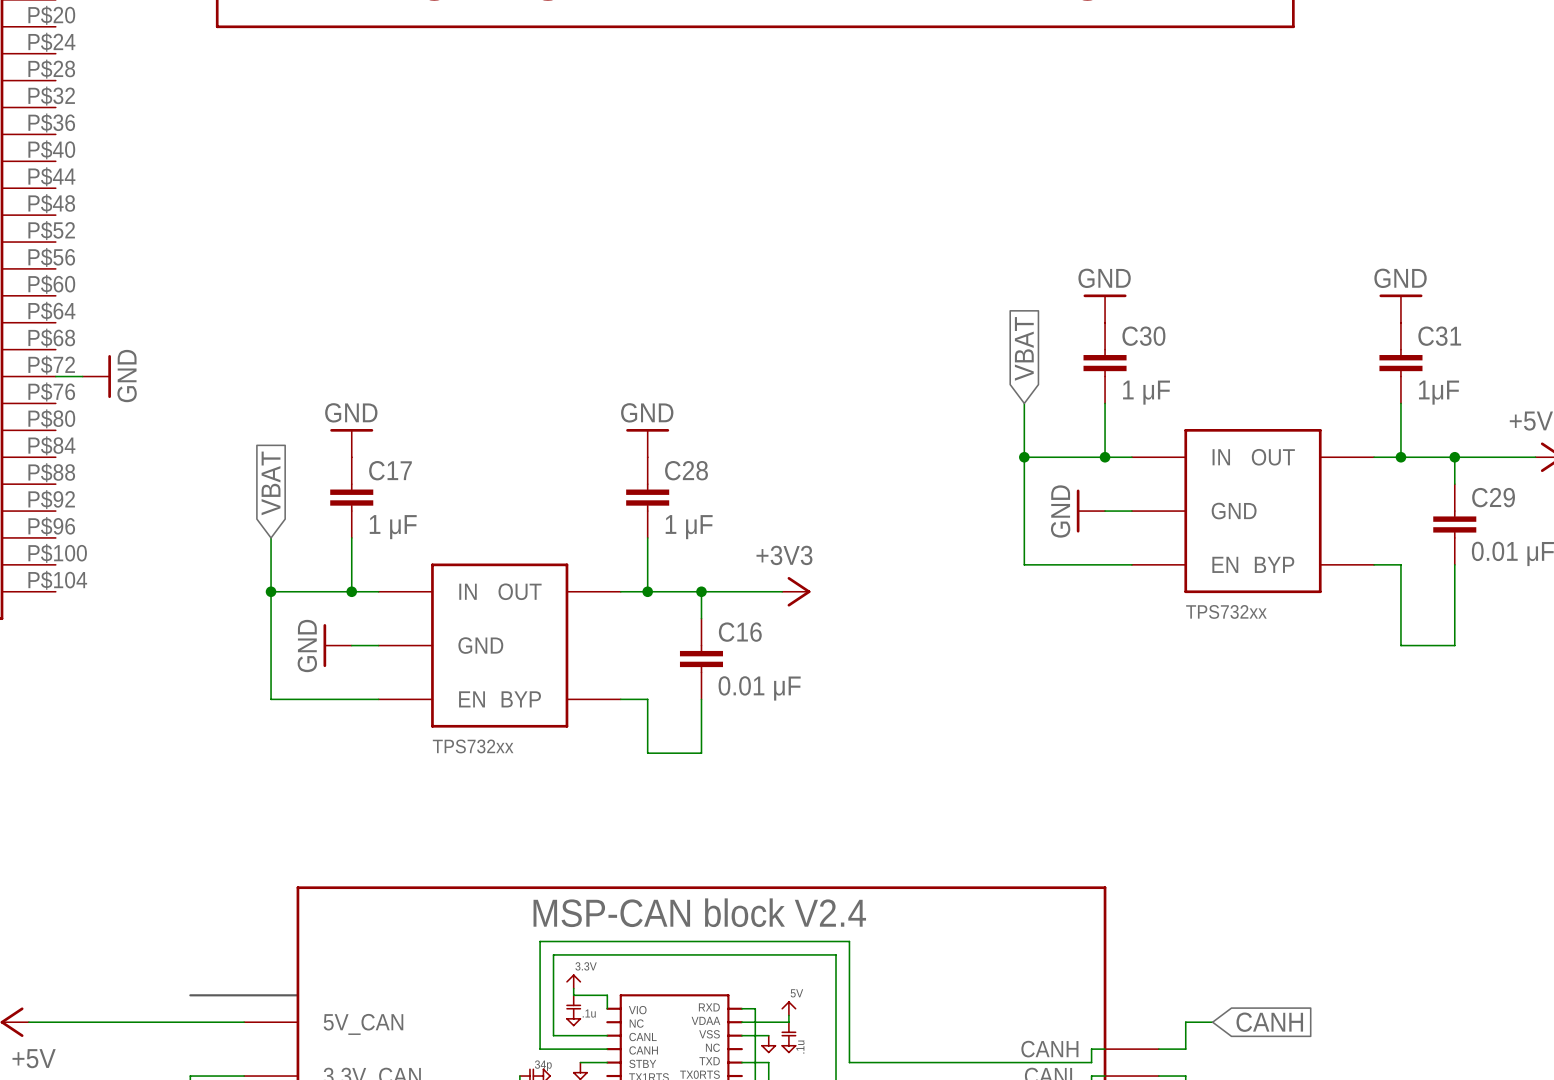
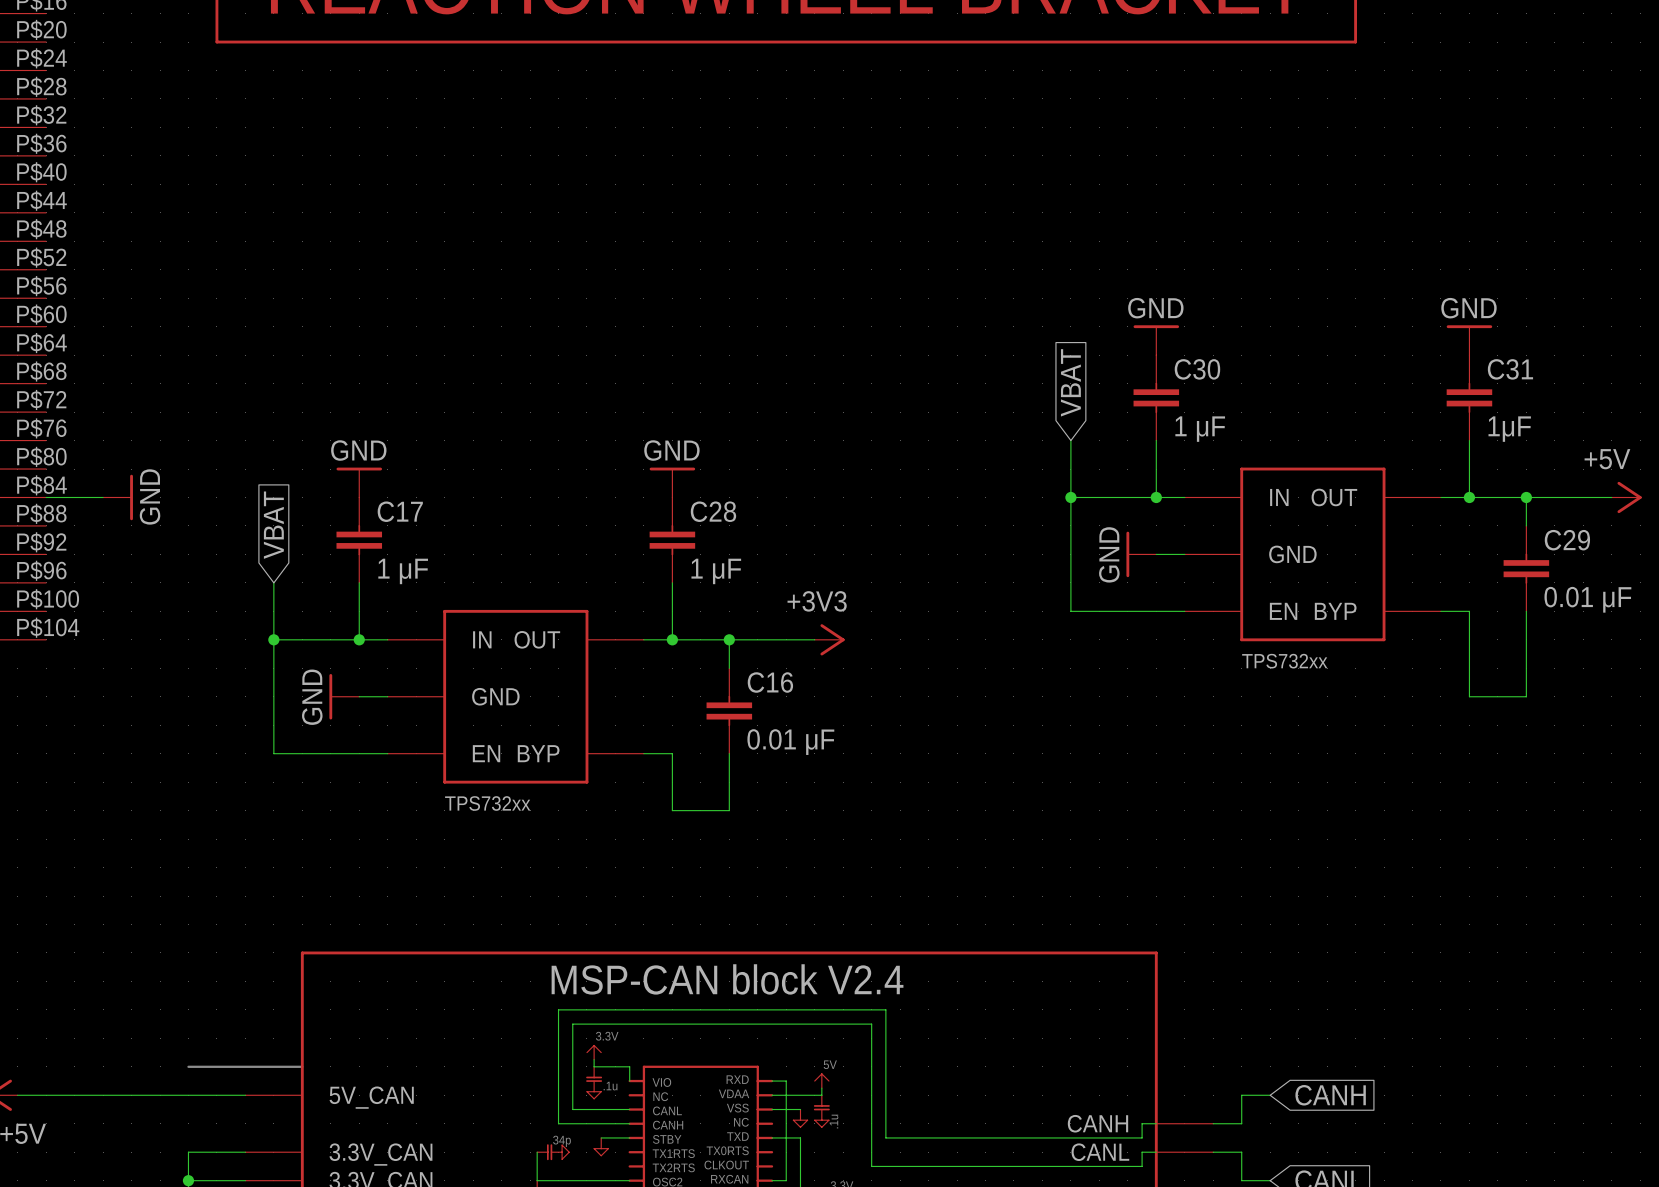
wire: (55, 376) (82, 376) -> none
power symbol position: GND (96, 376) -> GND (118, 497)
wire: none -> (46, 497) (103, 497)

